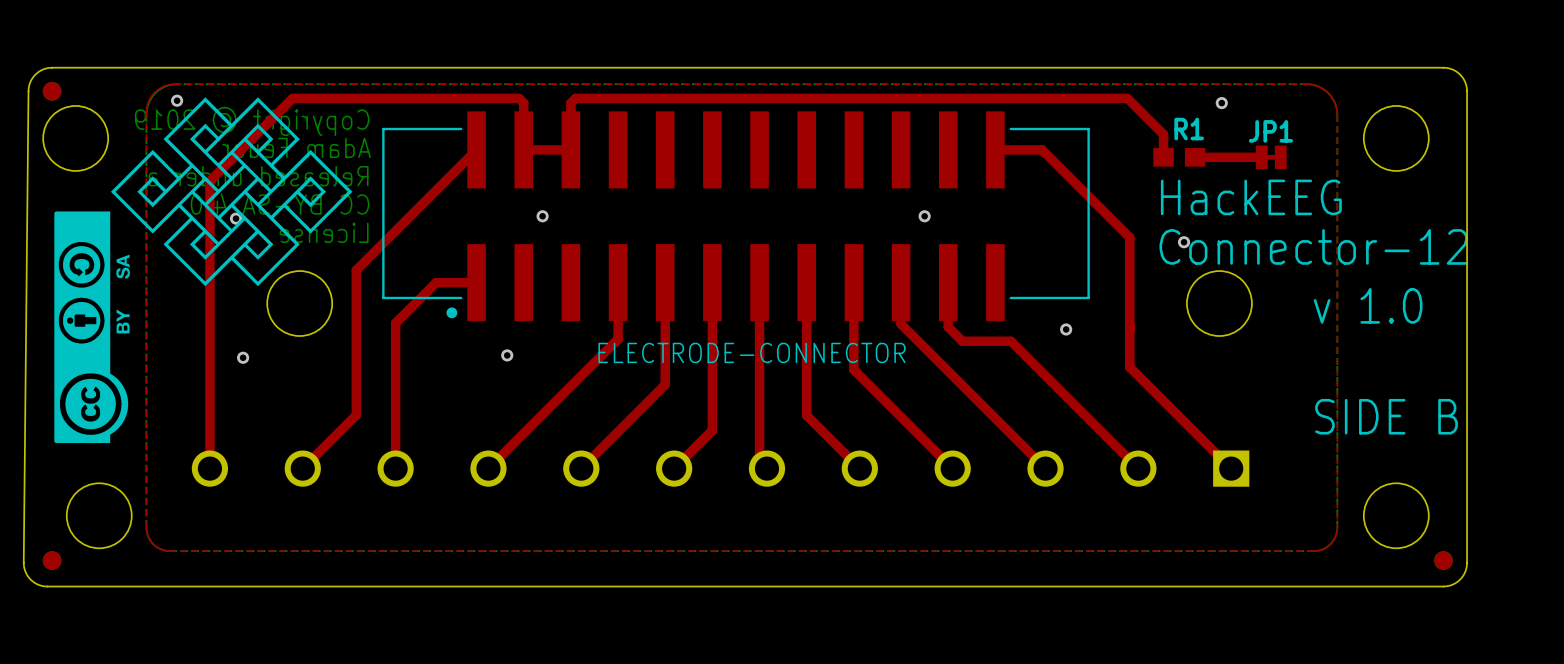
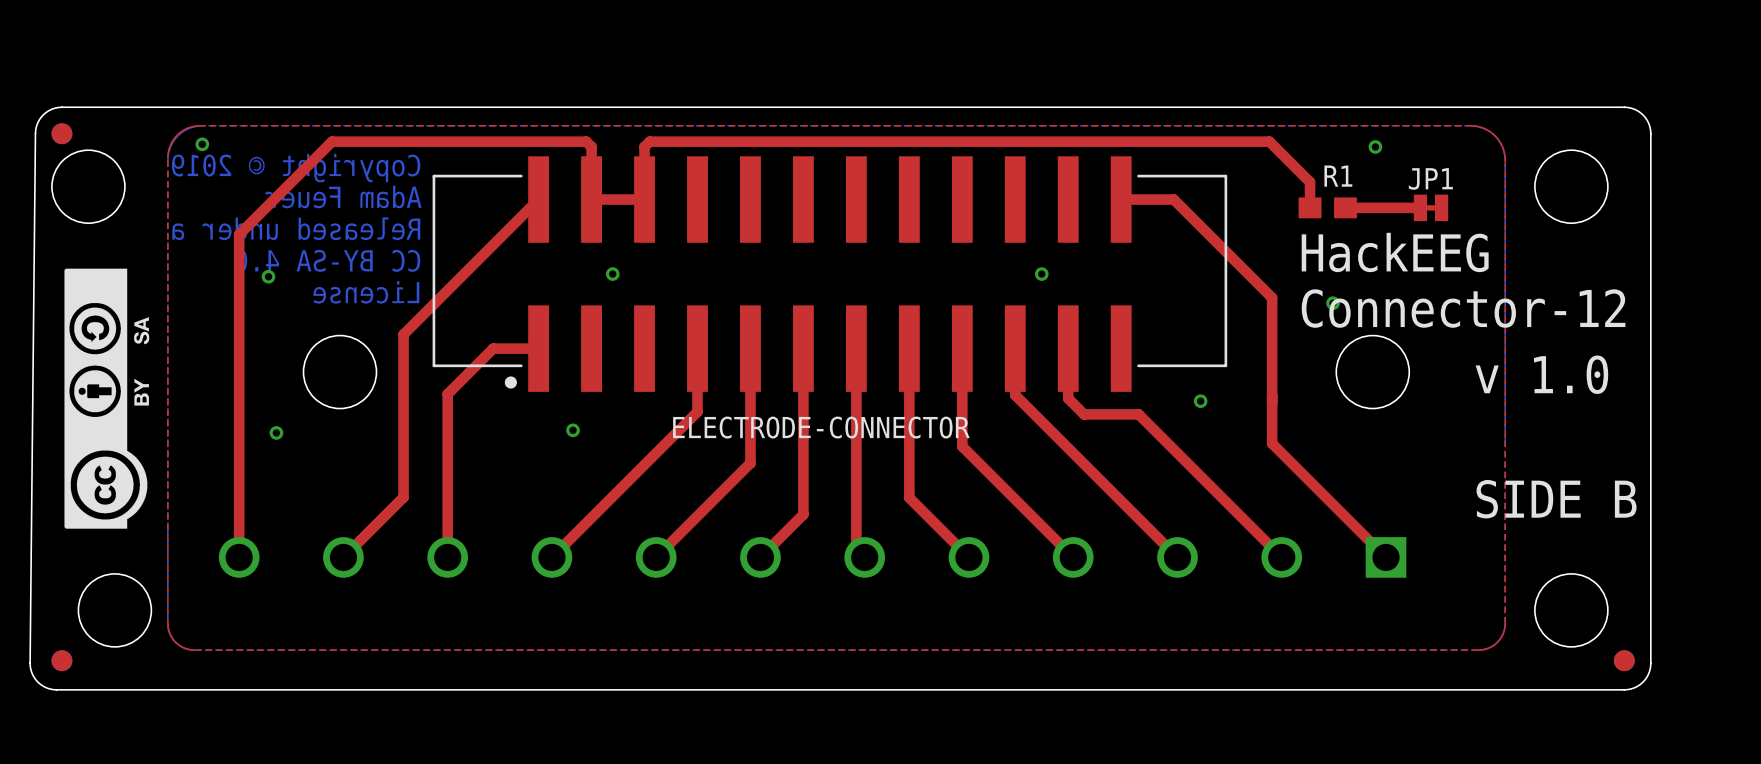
drawing: [110, 97, 353, 287] -> none

